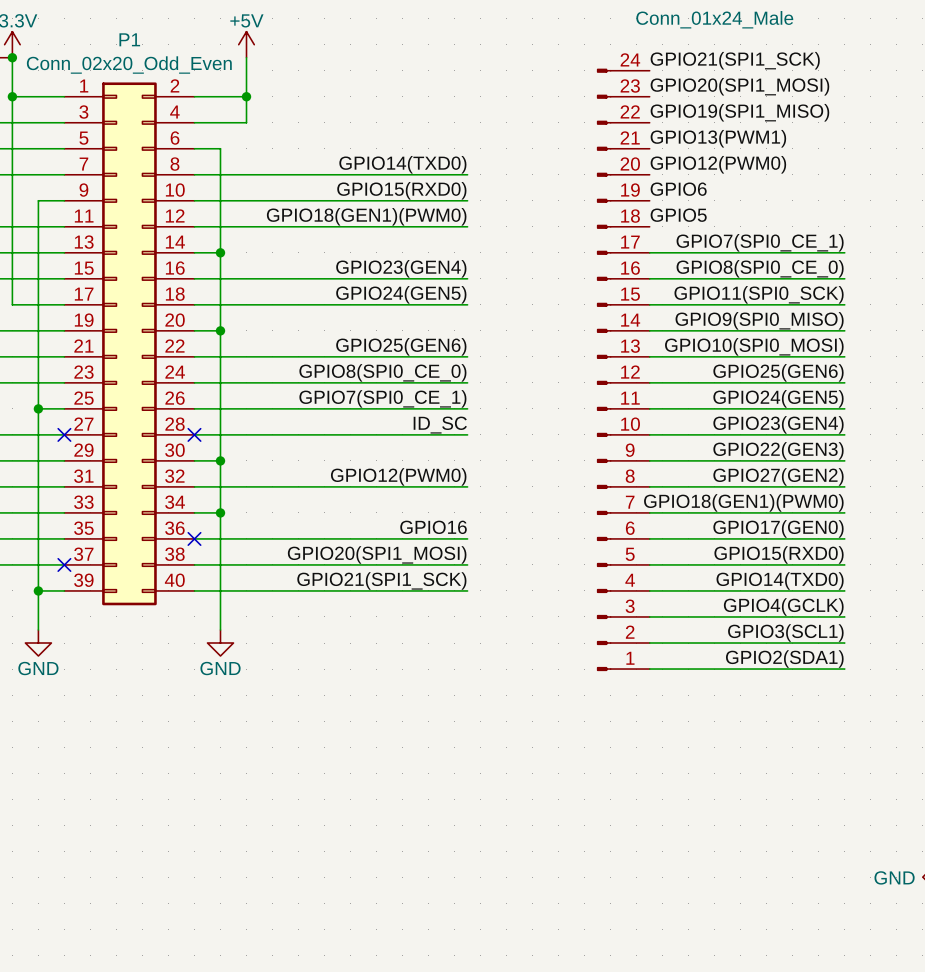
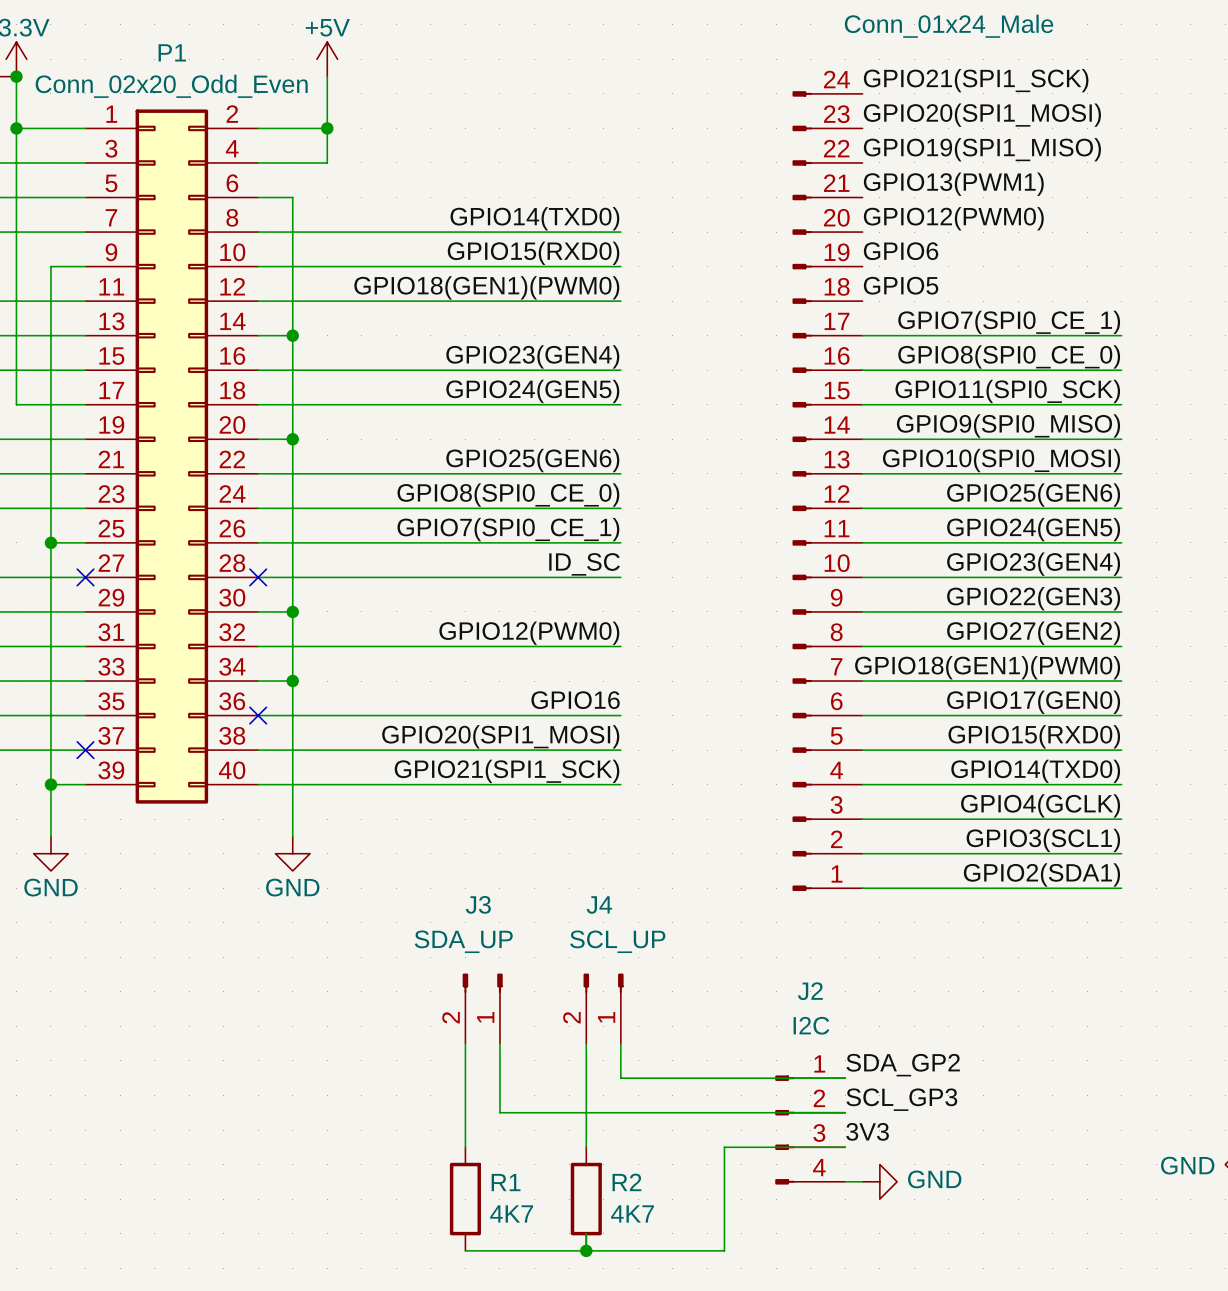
J3: none -> SDA_UP (482, 1008)
J4: none -> SCL_UP (603, 1008)
wire: none -> (465, 1043) (465, 1147)
wire: none -> (499, 1043) (499, 1112) (845, 1112)
wire: none -> (586, 1043) (586, 1147)
wire: none -> (620, 1043) (620, 1078) (845, 1078)
label: none -> SDA_GP2 (903, 1065)
label: none -> SCL_GP3 (901, 1099)
J2: none -> I2C (810, 1130)
label: none -> 3V3 (867, 1131)
wire: none -> (845, 1147) (724, 1147) (724, 1250) (465, 1250)
wire: none -> (845, 1181) (862, 1181)
power symbol: none -> GND (879, 1181)
R1: none -> 4K7 (465, 1199)
R2: none -> 4K7 (586, 1199)
wire: none -> (586, 1233) (586, 1250)
junction: none -> (586, 1250)

